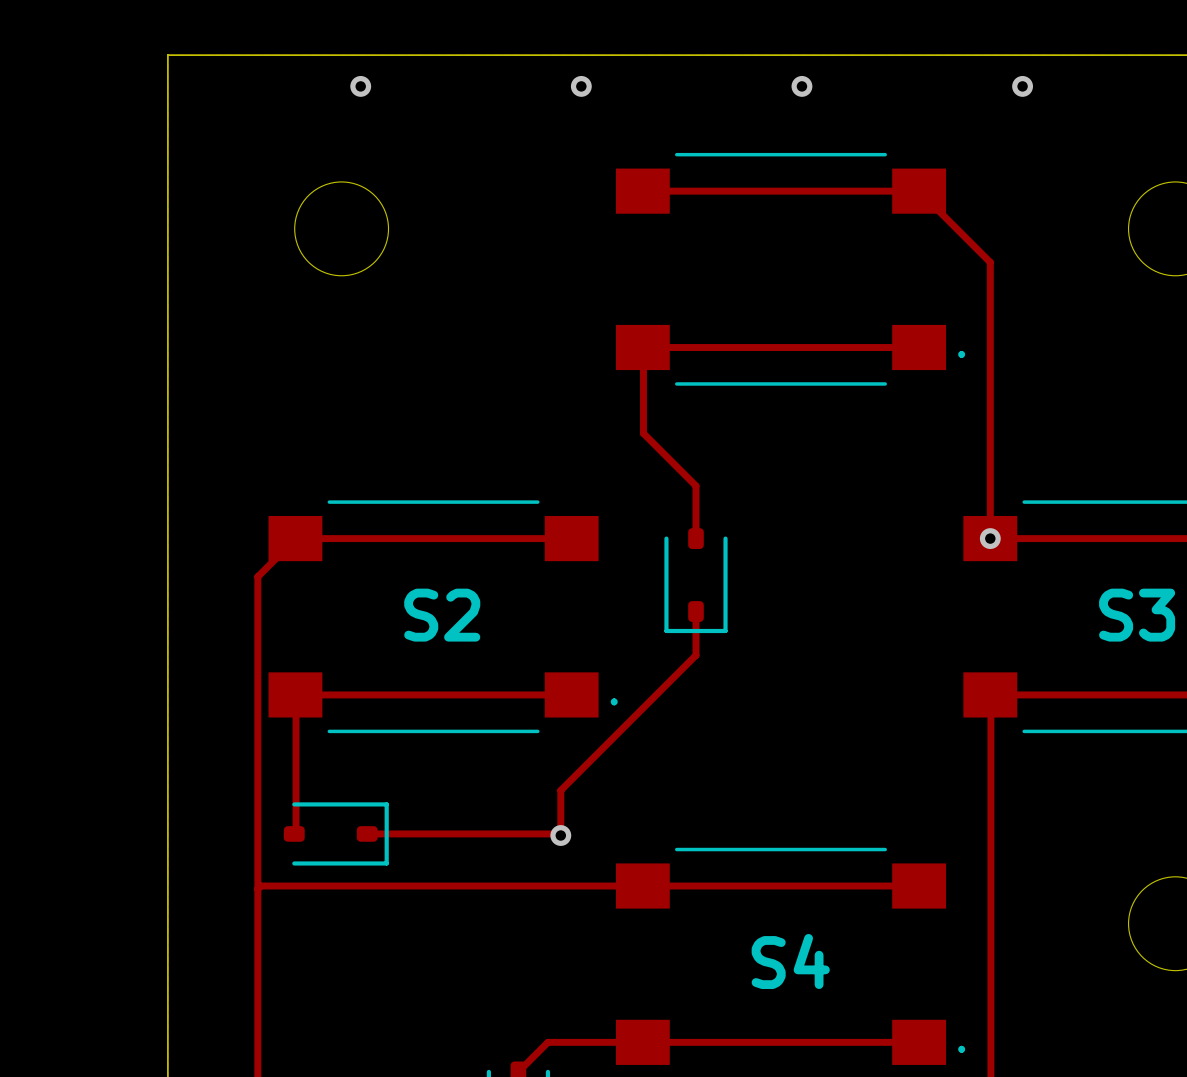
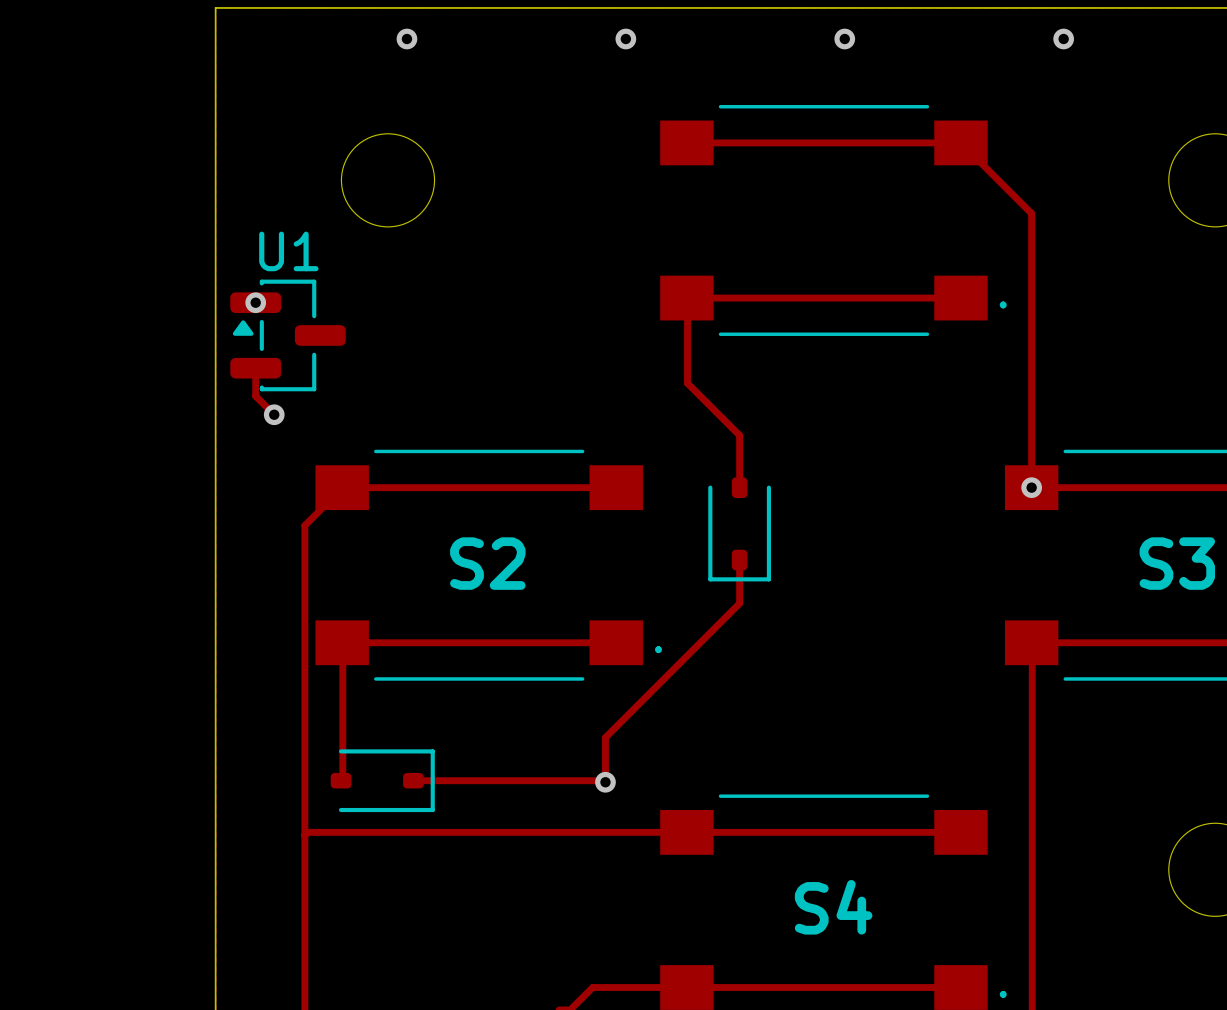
via: none -> (255, 302)
U1: none -> (288, 335)
track: none -> (255, 368) (255, 396) (274, 414)
via: none -> (274, 414)

